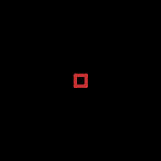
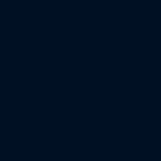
top track: (75, 75) (86, 75) (86, 86) (75, 86) (75, 75) -> none

